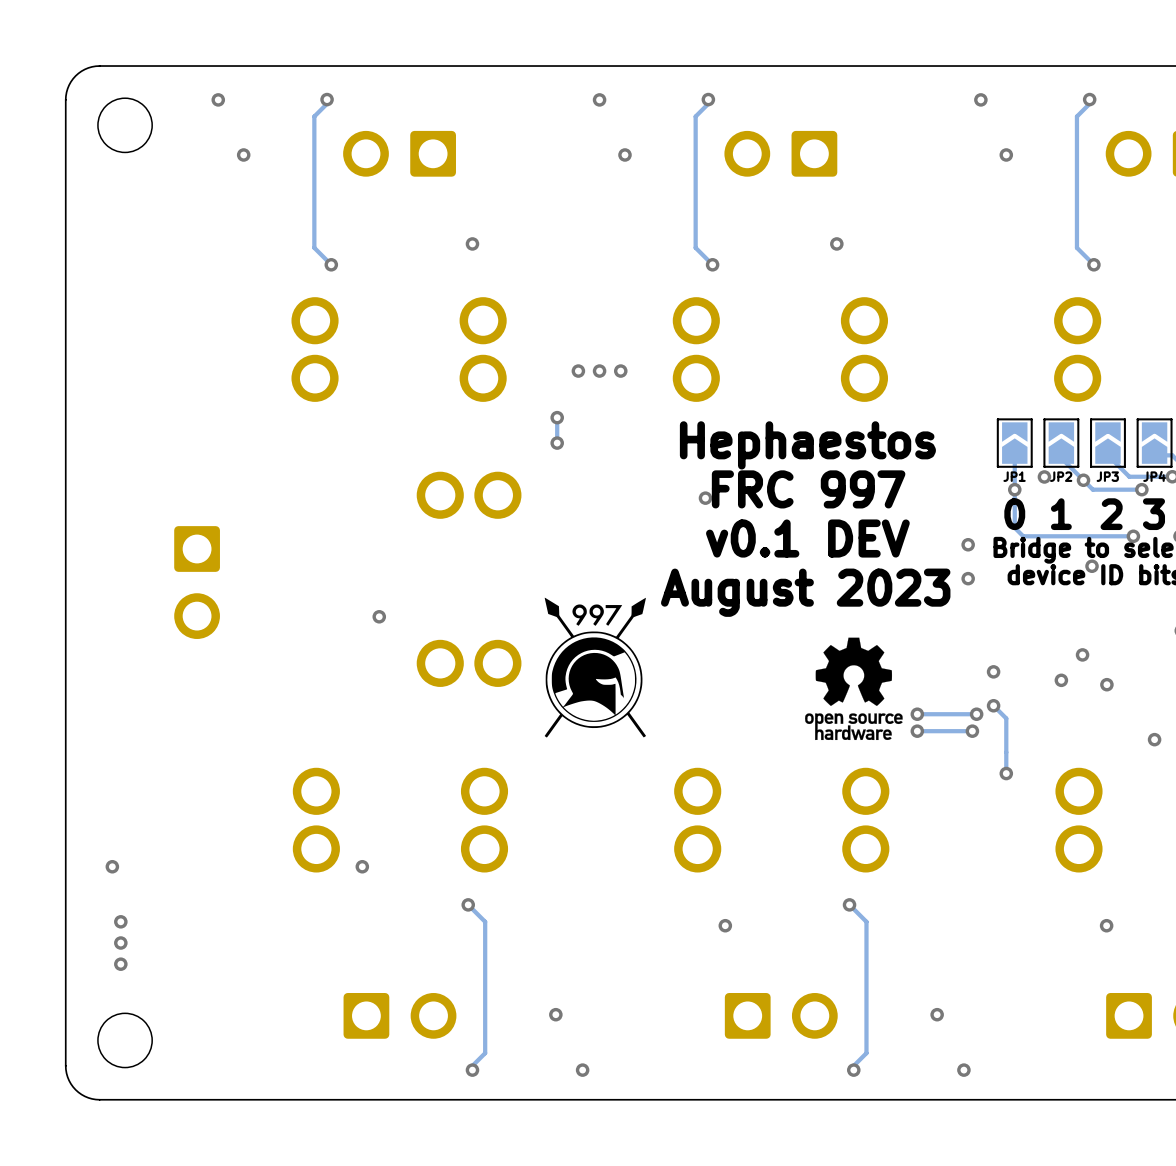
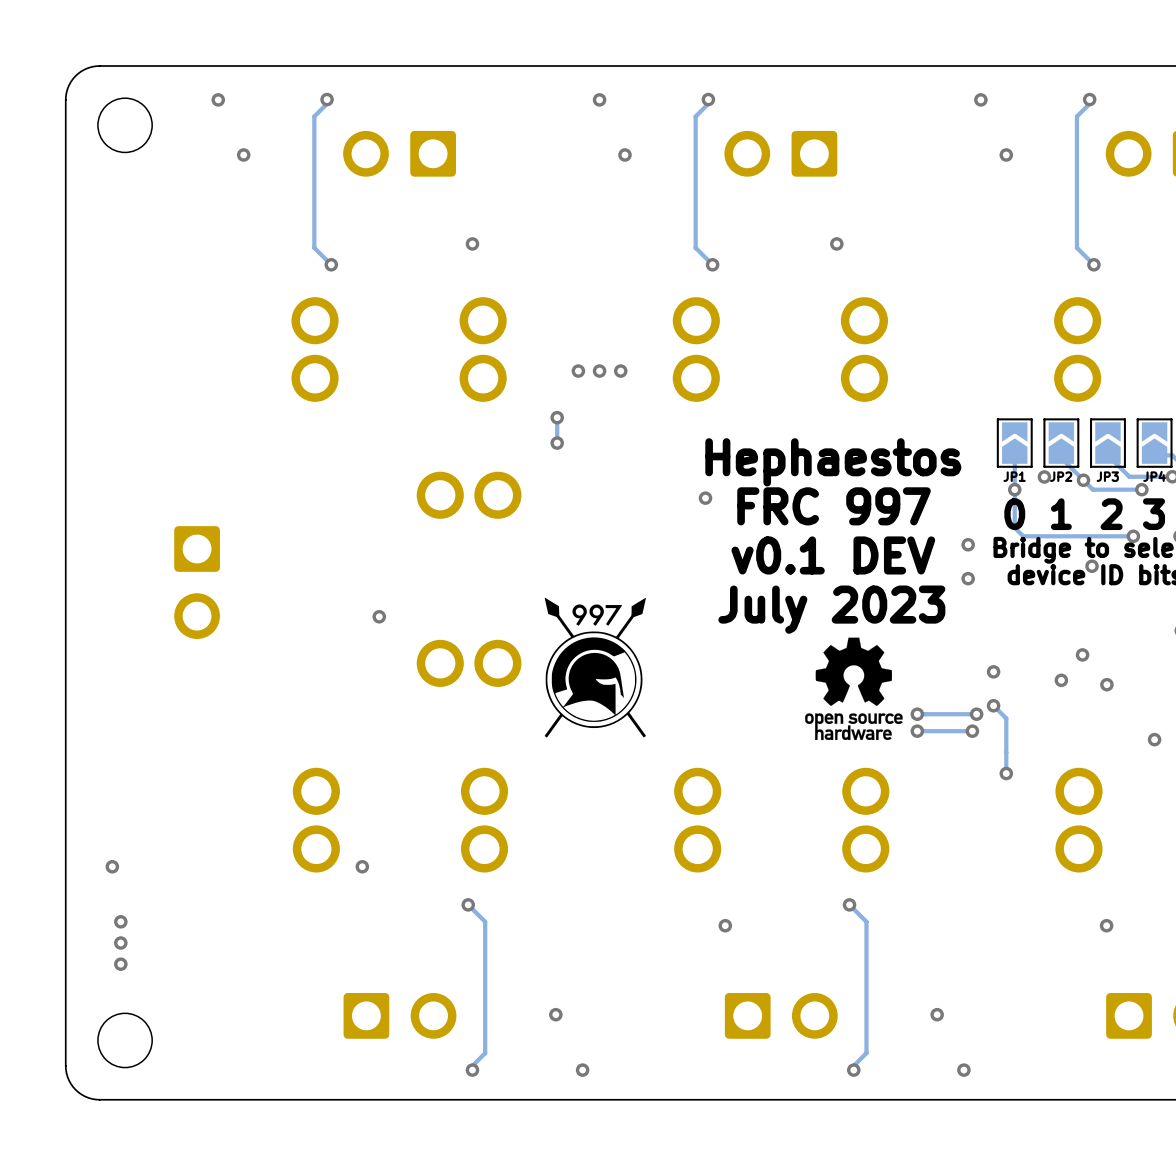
text position: Hephaestos (807, 445) -> Hephaestos (833, 462)
text position: FRC 997 (808, 489) -> FRC 997 (834, 506)
text position: v0.1 DEV (807, 538) -> v0.1 DEV (833, 555)
text: August 2023 (805, 592) -> none
text: none -> July 2023 (831, 609)

